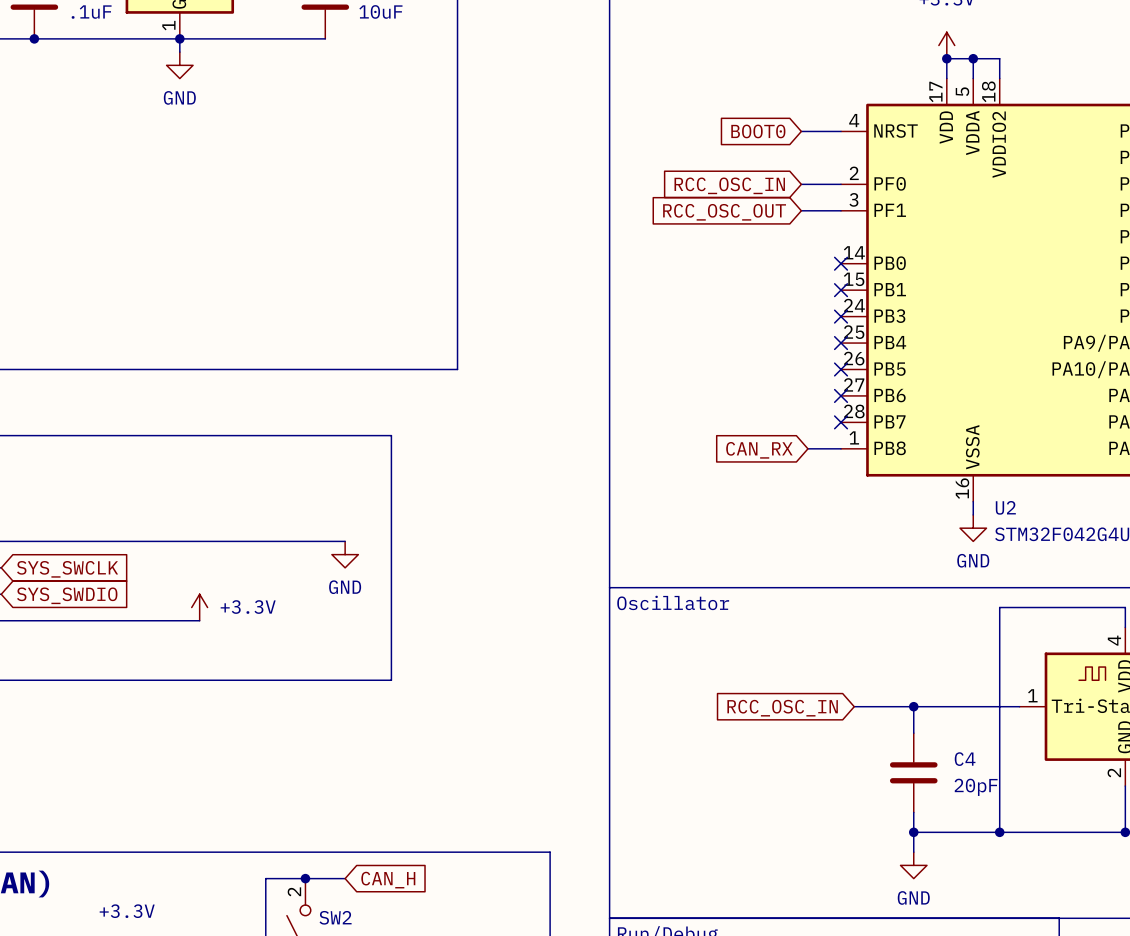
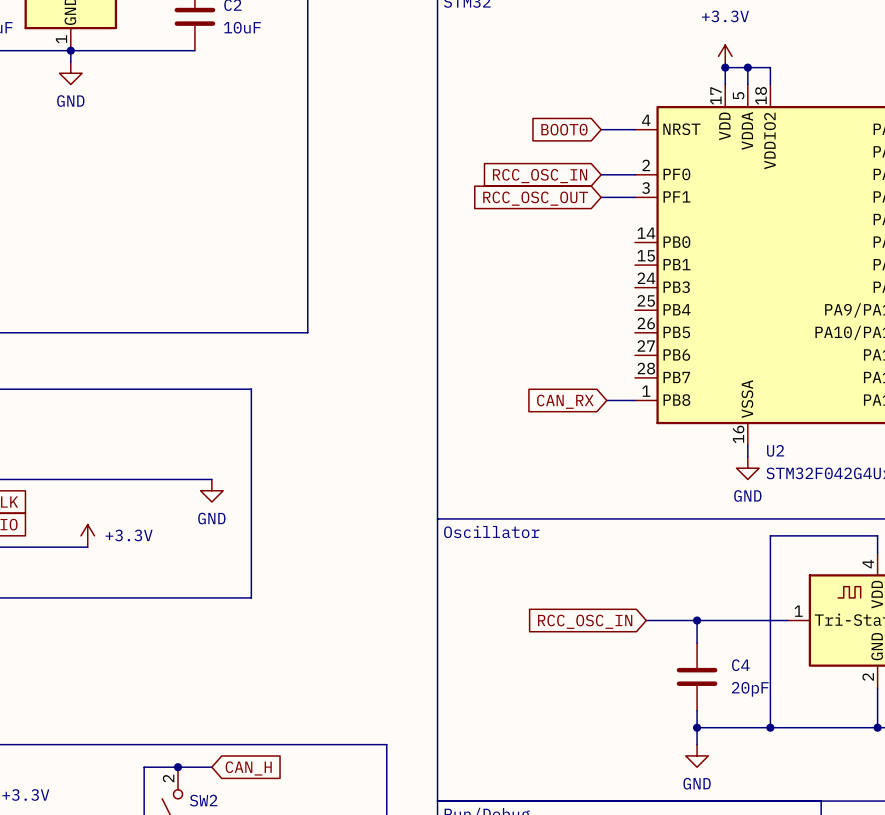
no-connect mark: (841, 263) -> none
no-connect mark: (841, 290) -> none
no-connect mark: (841, 316) -> none
no-connect mark: (841, 343) -> none
no-connect mark: (841, 369) -> none
no-connect mark: (841, 395) -> none
no-connect mark: (841, 422) -> none

